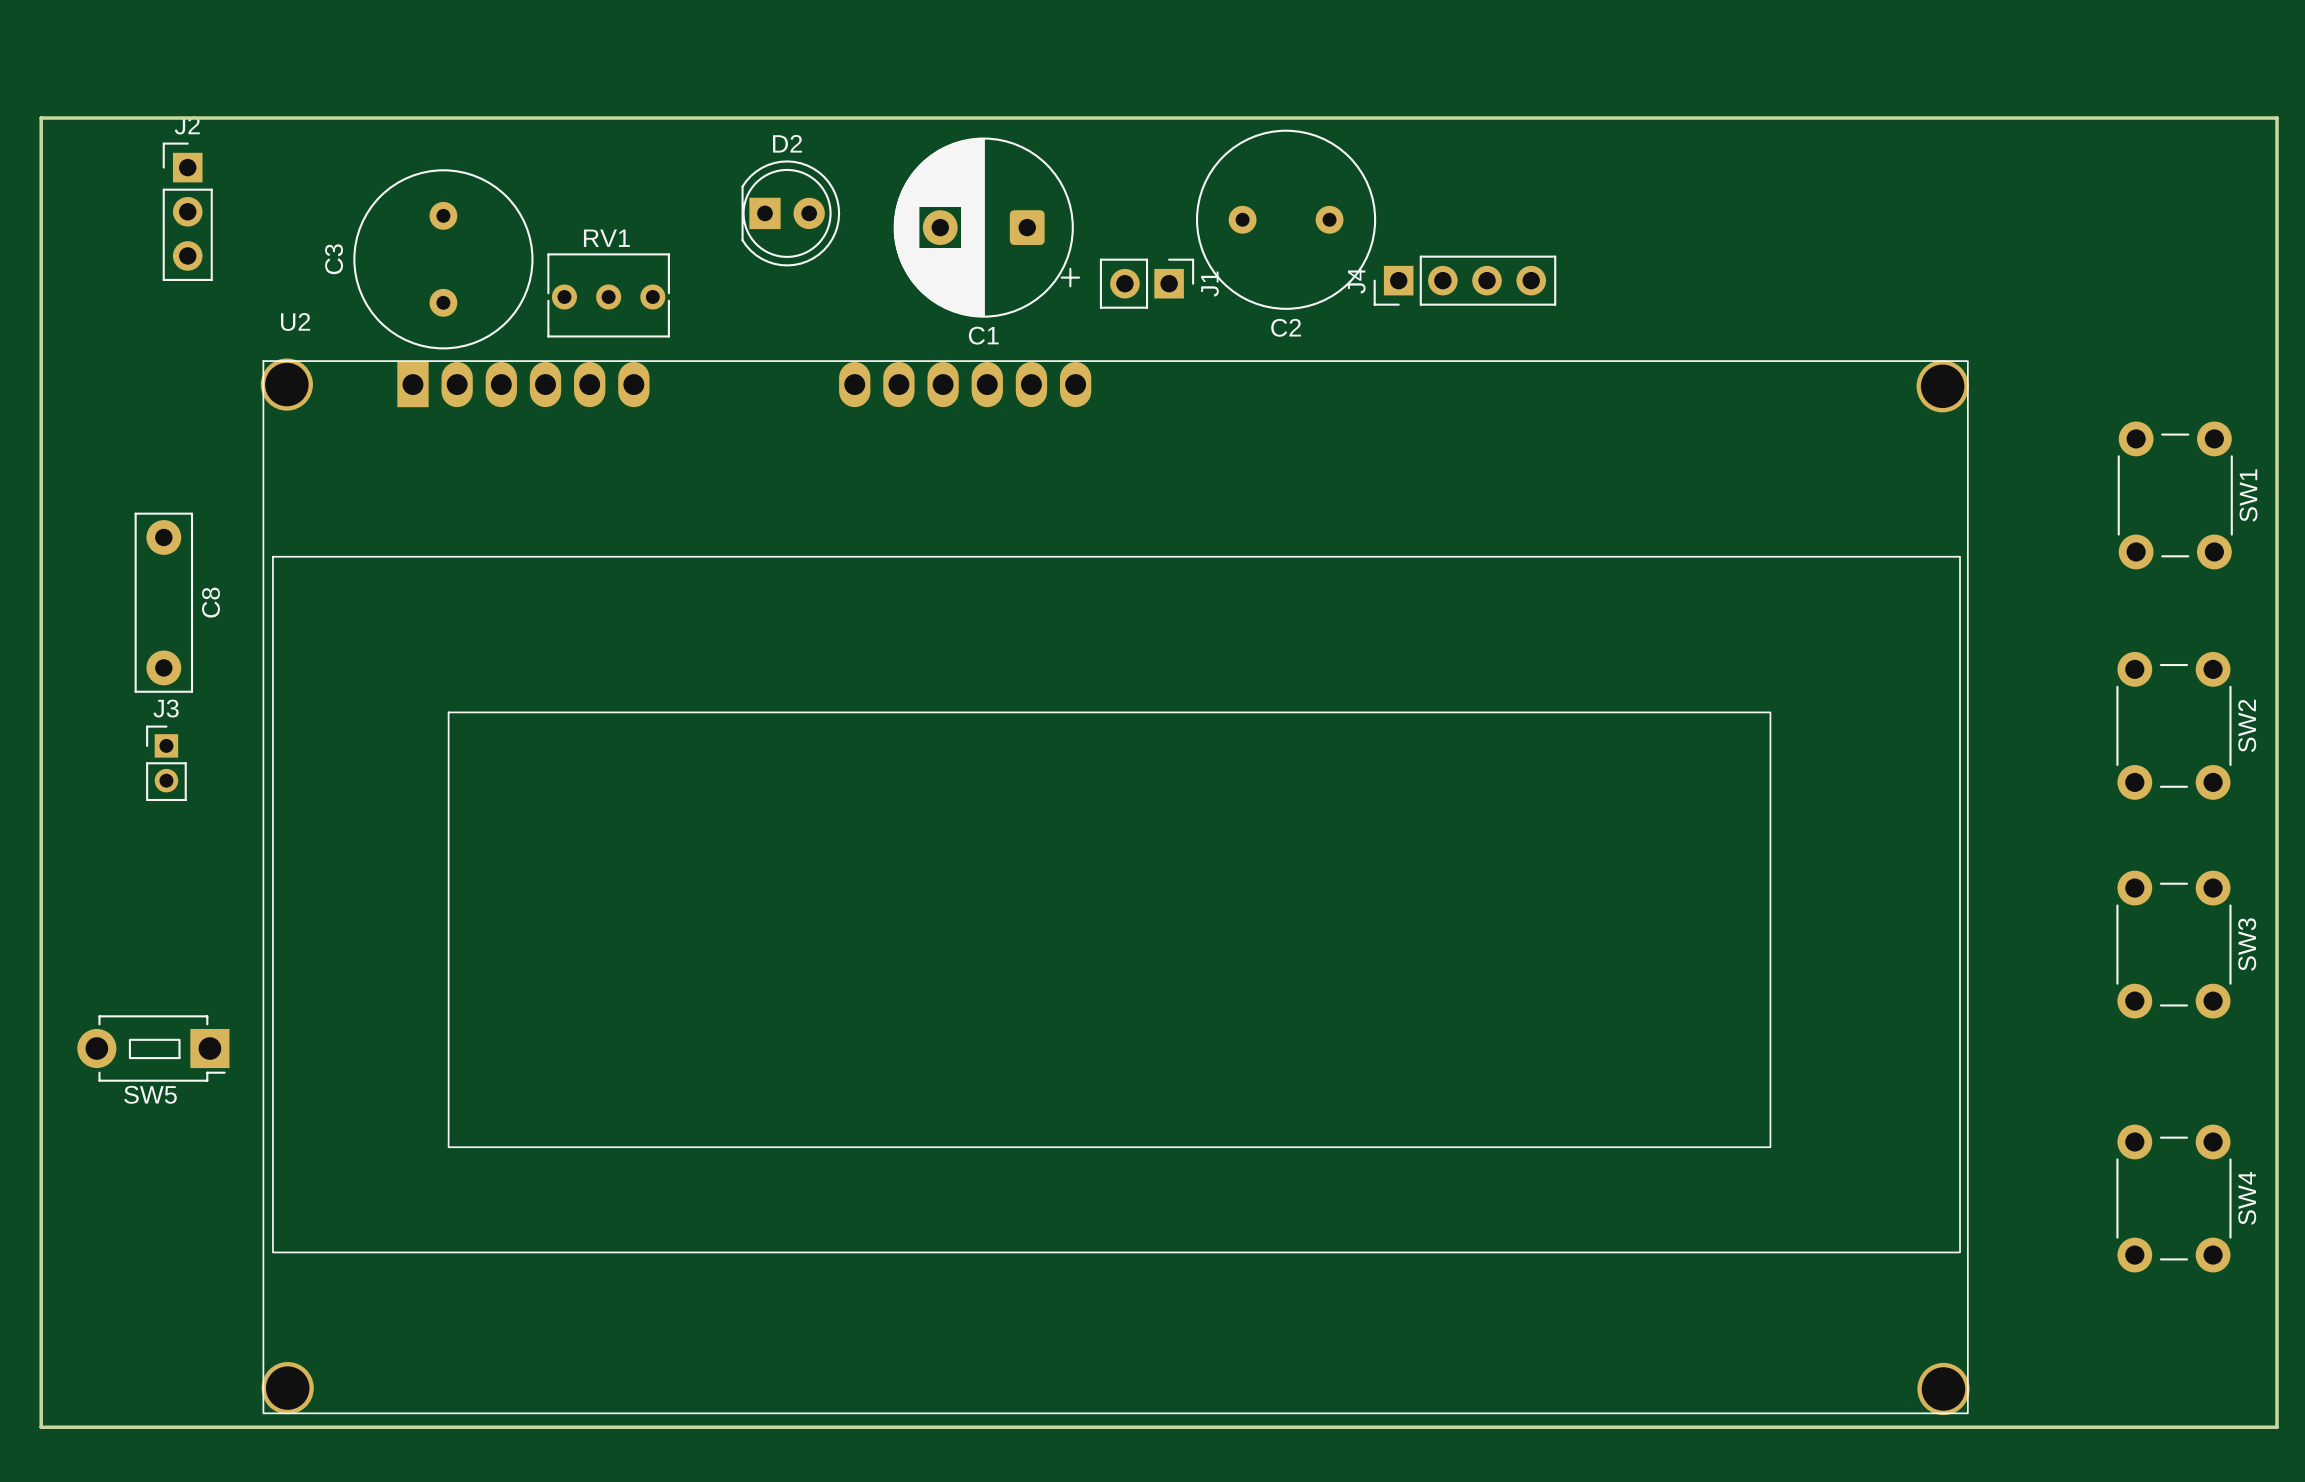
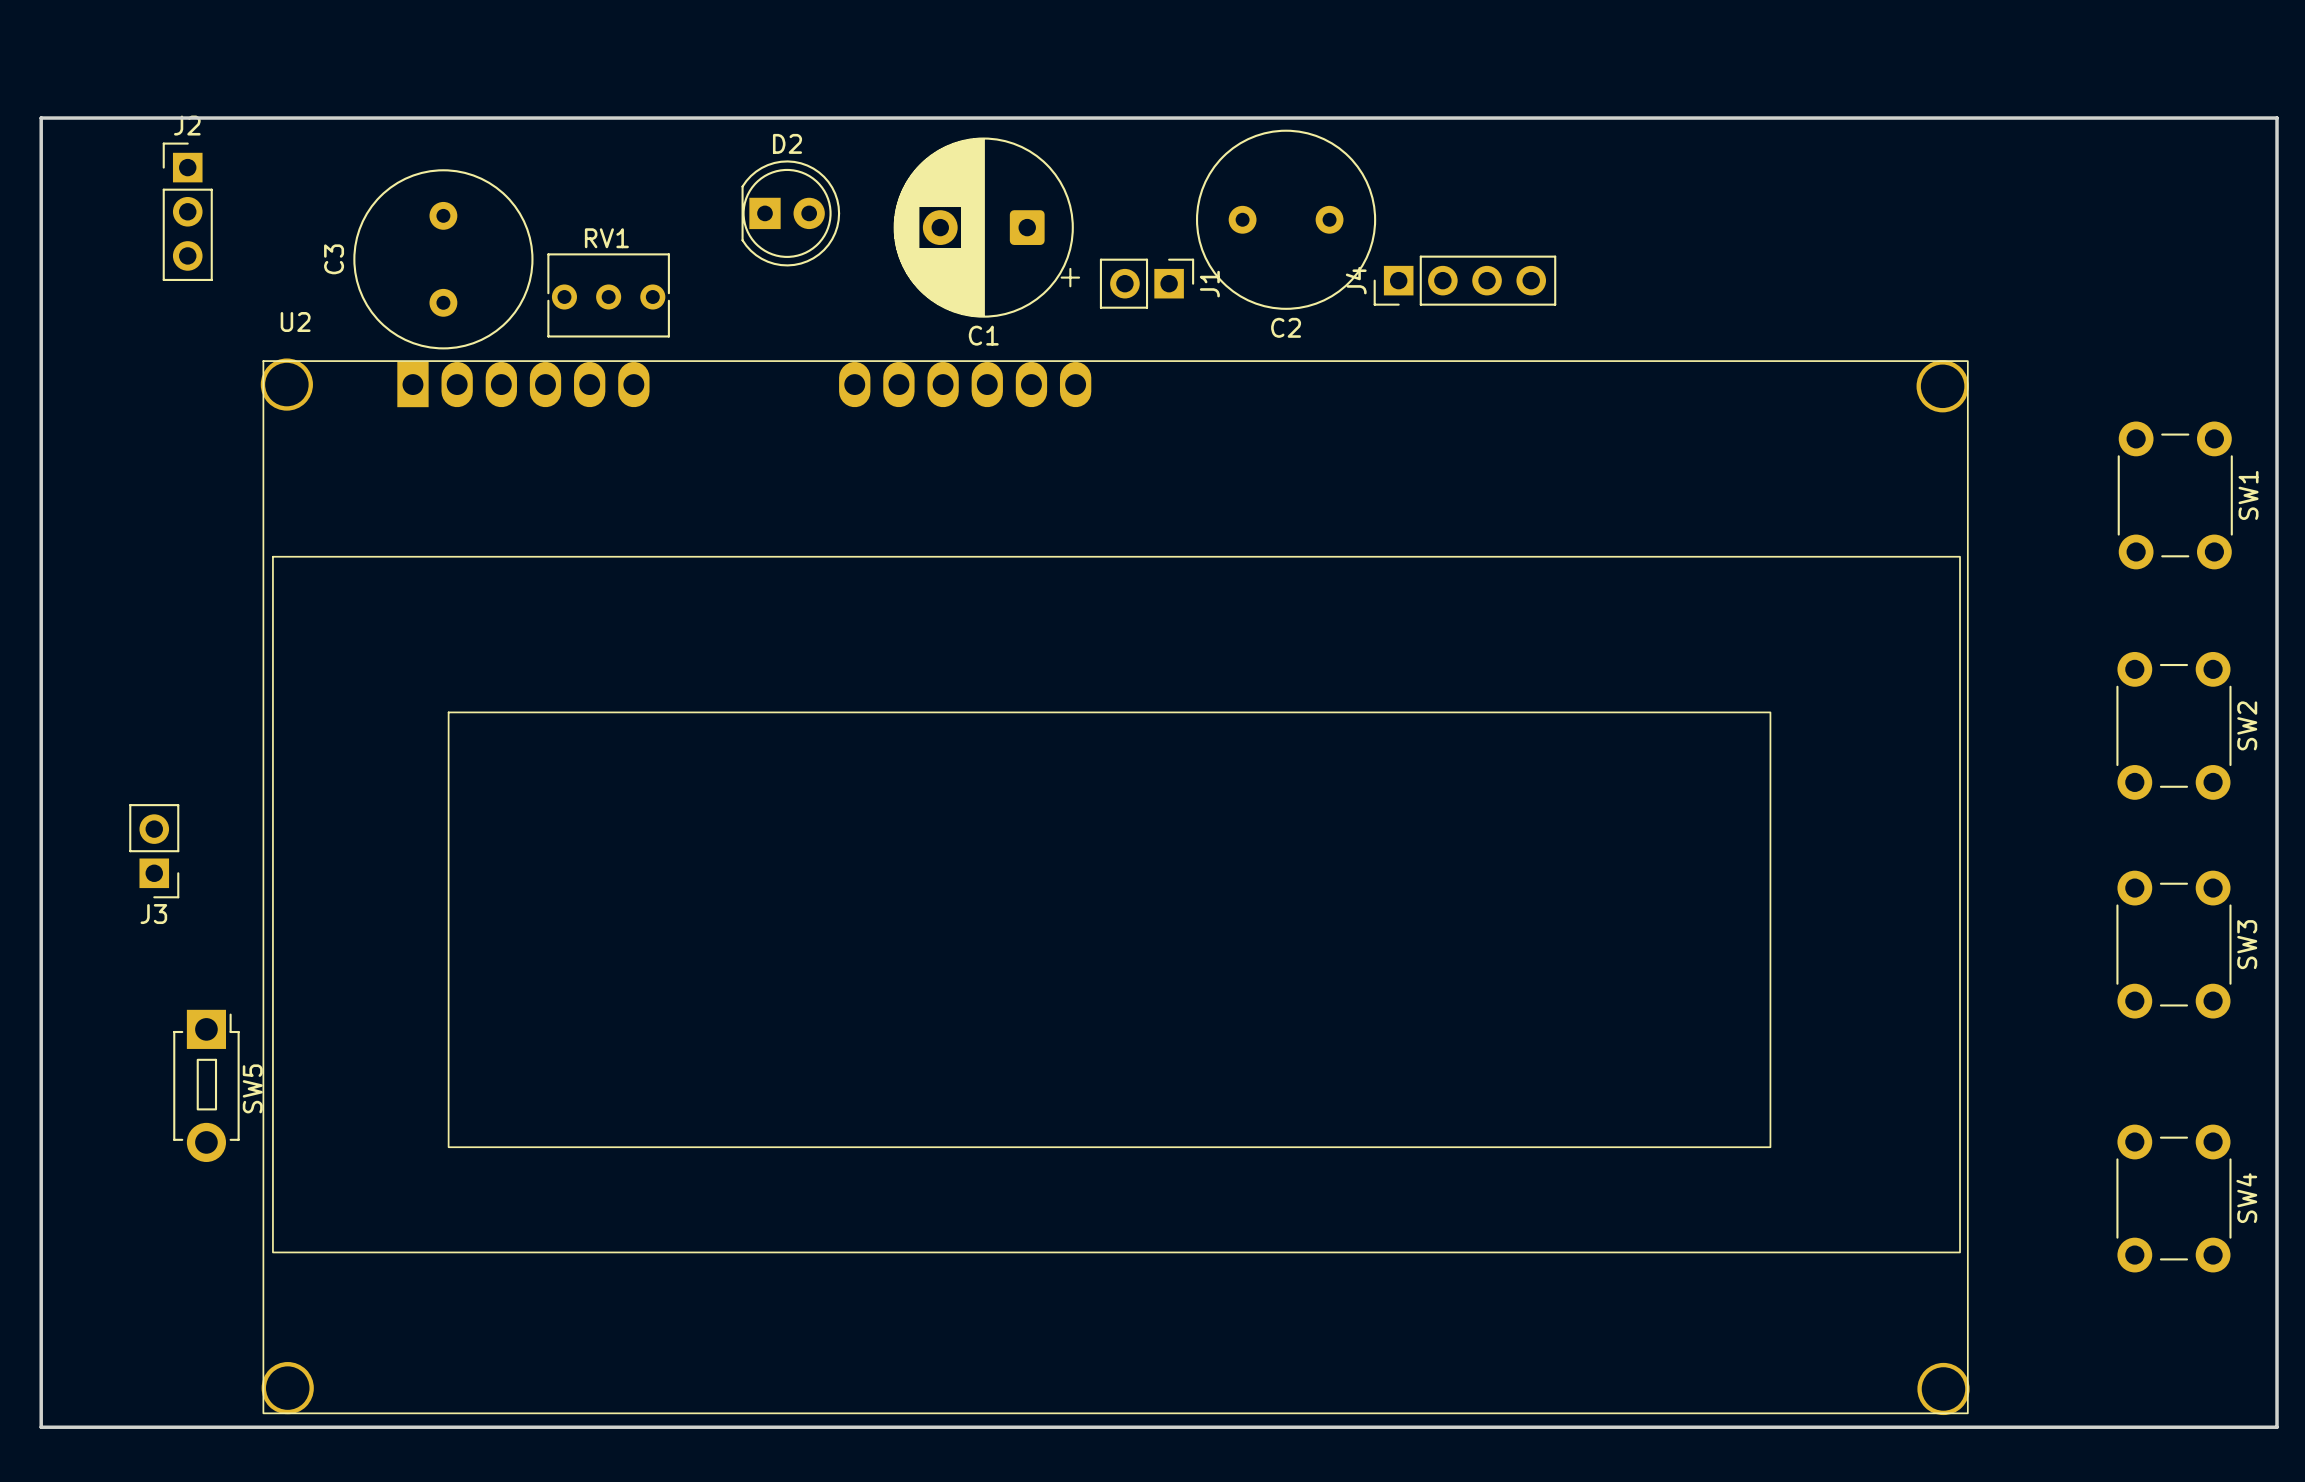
C8: (163, 602) -> none
J3 name position: J3 (166, 708) -> J3 (153, 914)
J3 footprint: [146, 725, 187, 802] -> [129, 804, 180, 899]
SW5 rotation: 0° (153, 1048) -> 90° counterclockwise (206, 1085)

